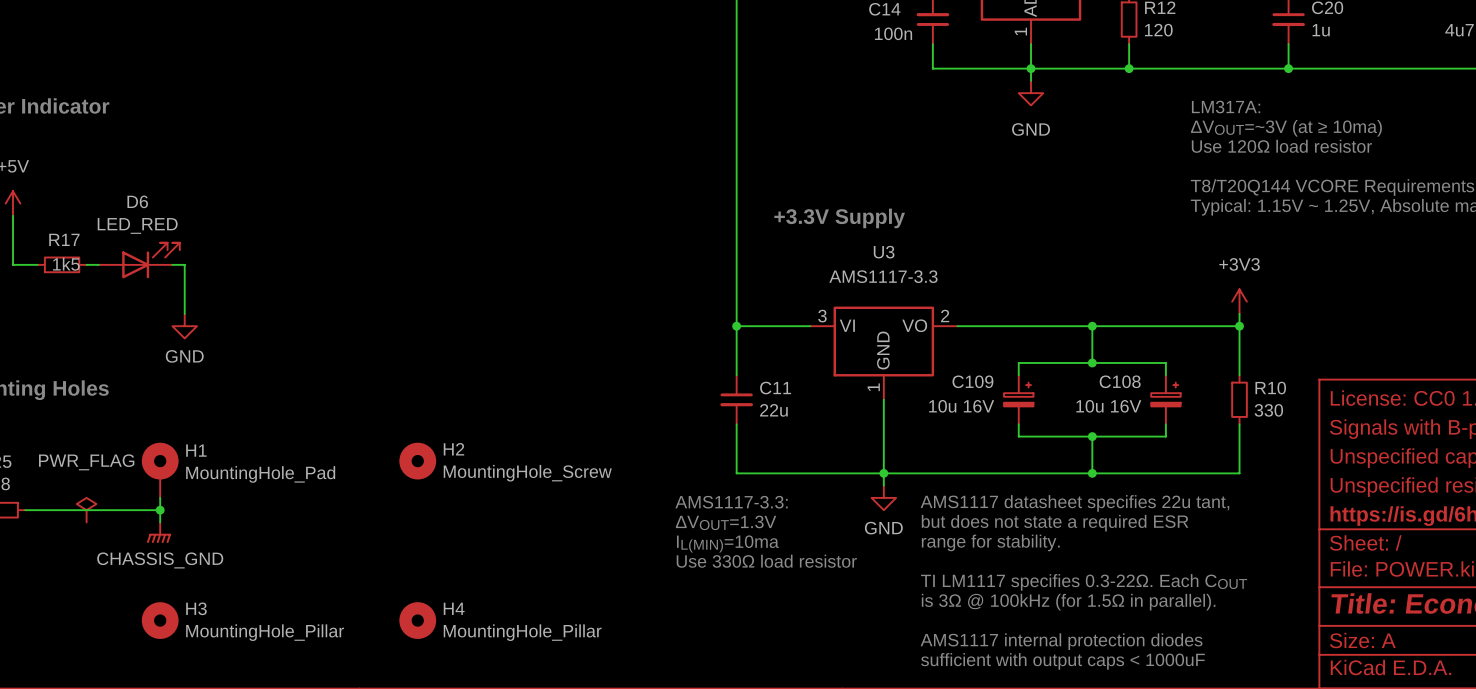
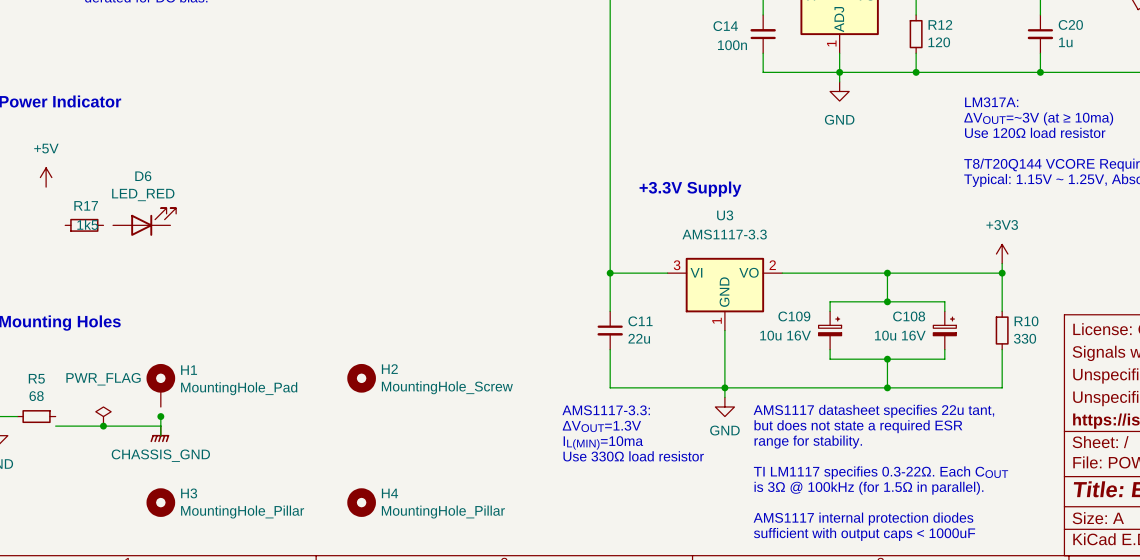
wire: (13, 215) (13, 264) (37, 264) -> none
wire: (86, 264) (98, 264) -> none
wire: (172, 264) (184, 264) (184, 313) -> none
power symbol: GND (184, 326) -> none
wire: (160, 497) (160, 510) (25, 510) -> none
wire: none -> (55, 426) (160, 426) (160, 435)
junction: none -> (103, 426)

